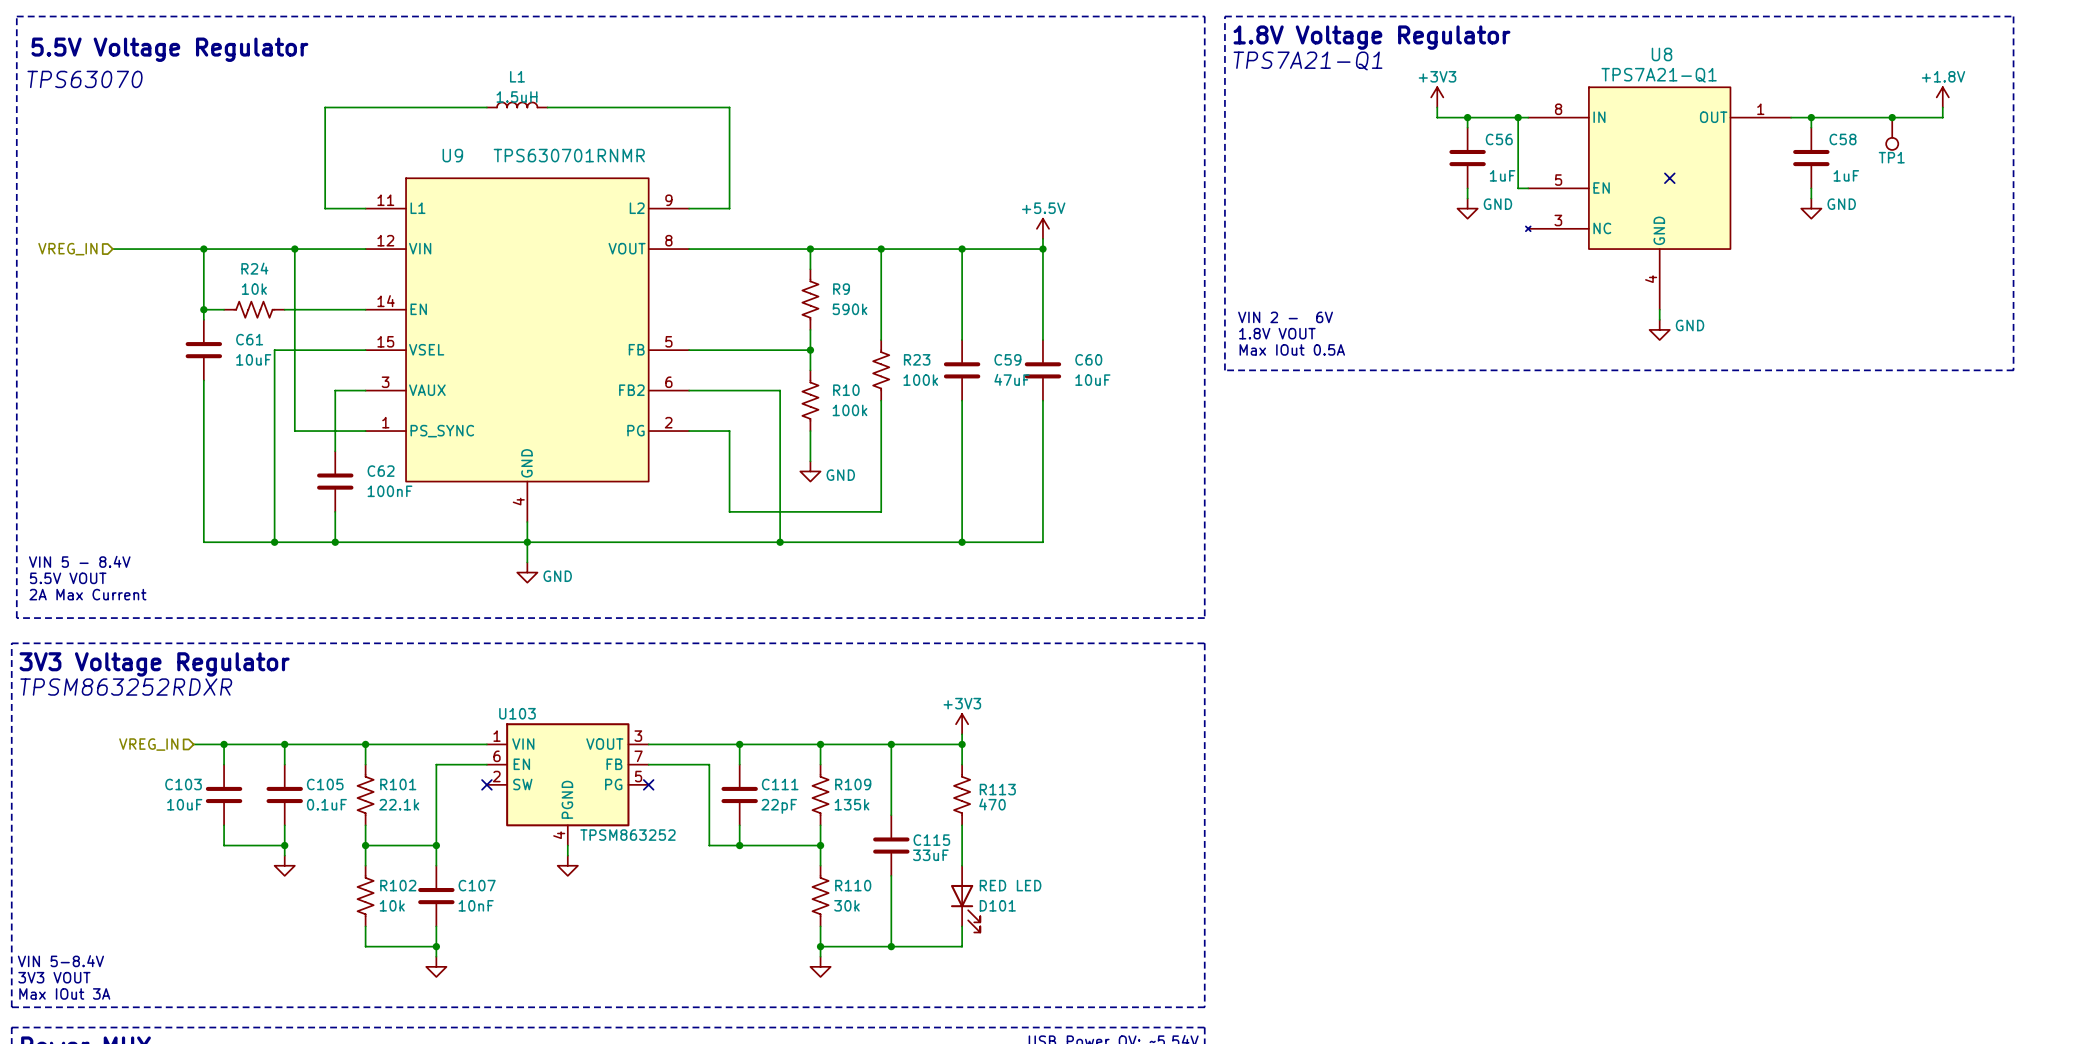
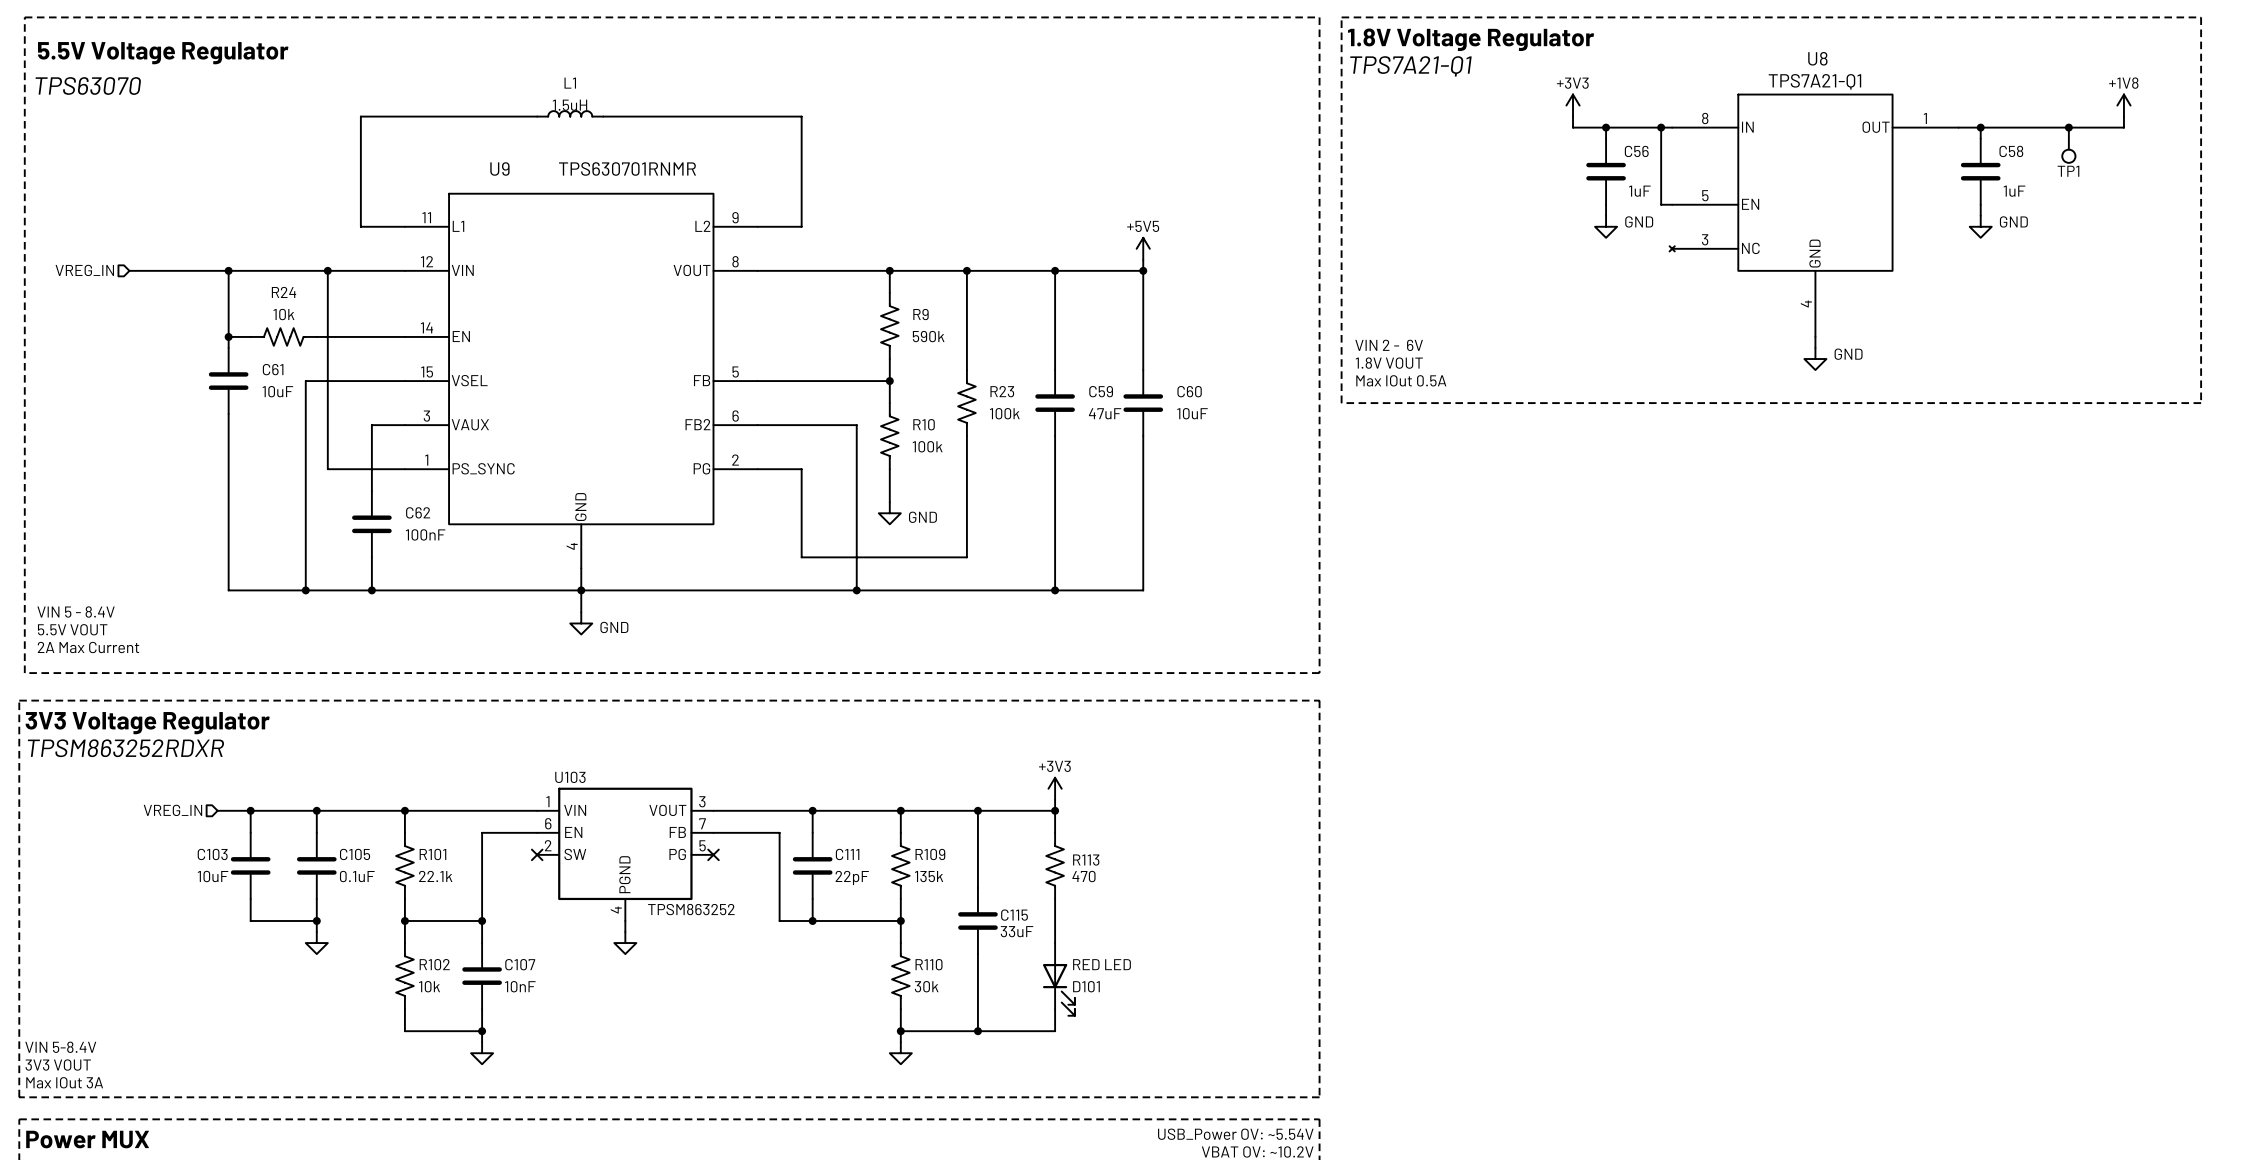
power symbol: +1.8V (1942, 97) -> +1V8 (2123, 105)
no-connect mark: (1669, 178) -> none
power symbol: +5.5V (1042, 228) -> +5V5 (1143, 248)

